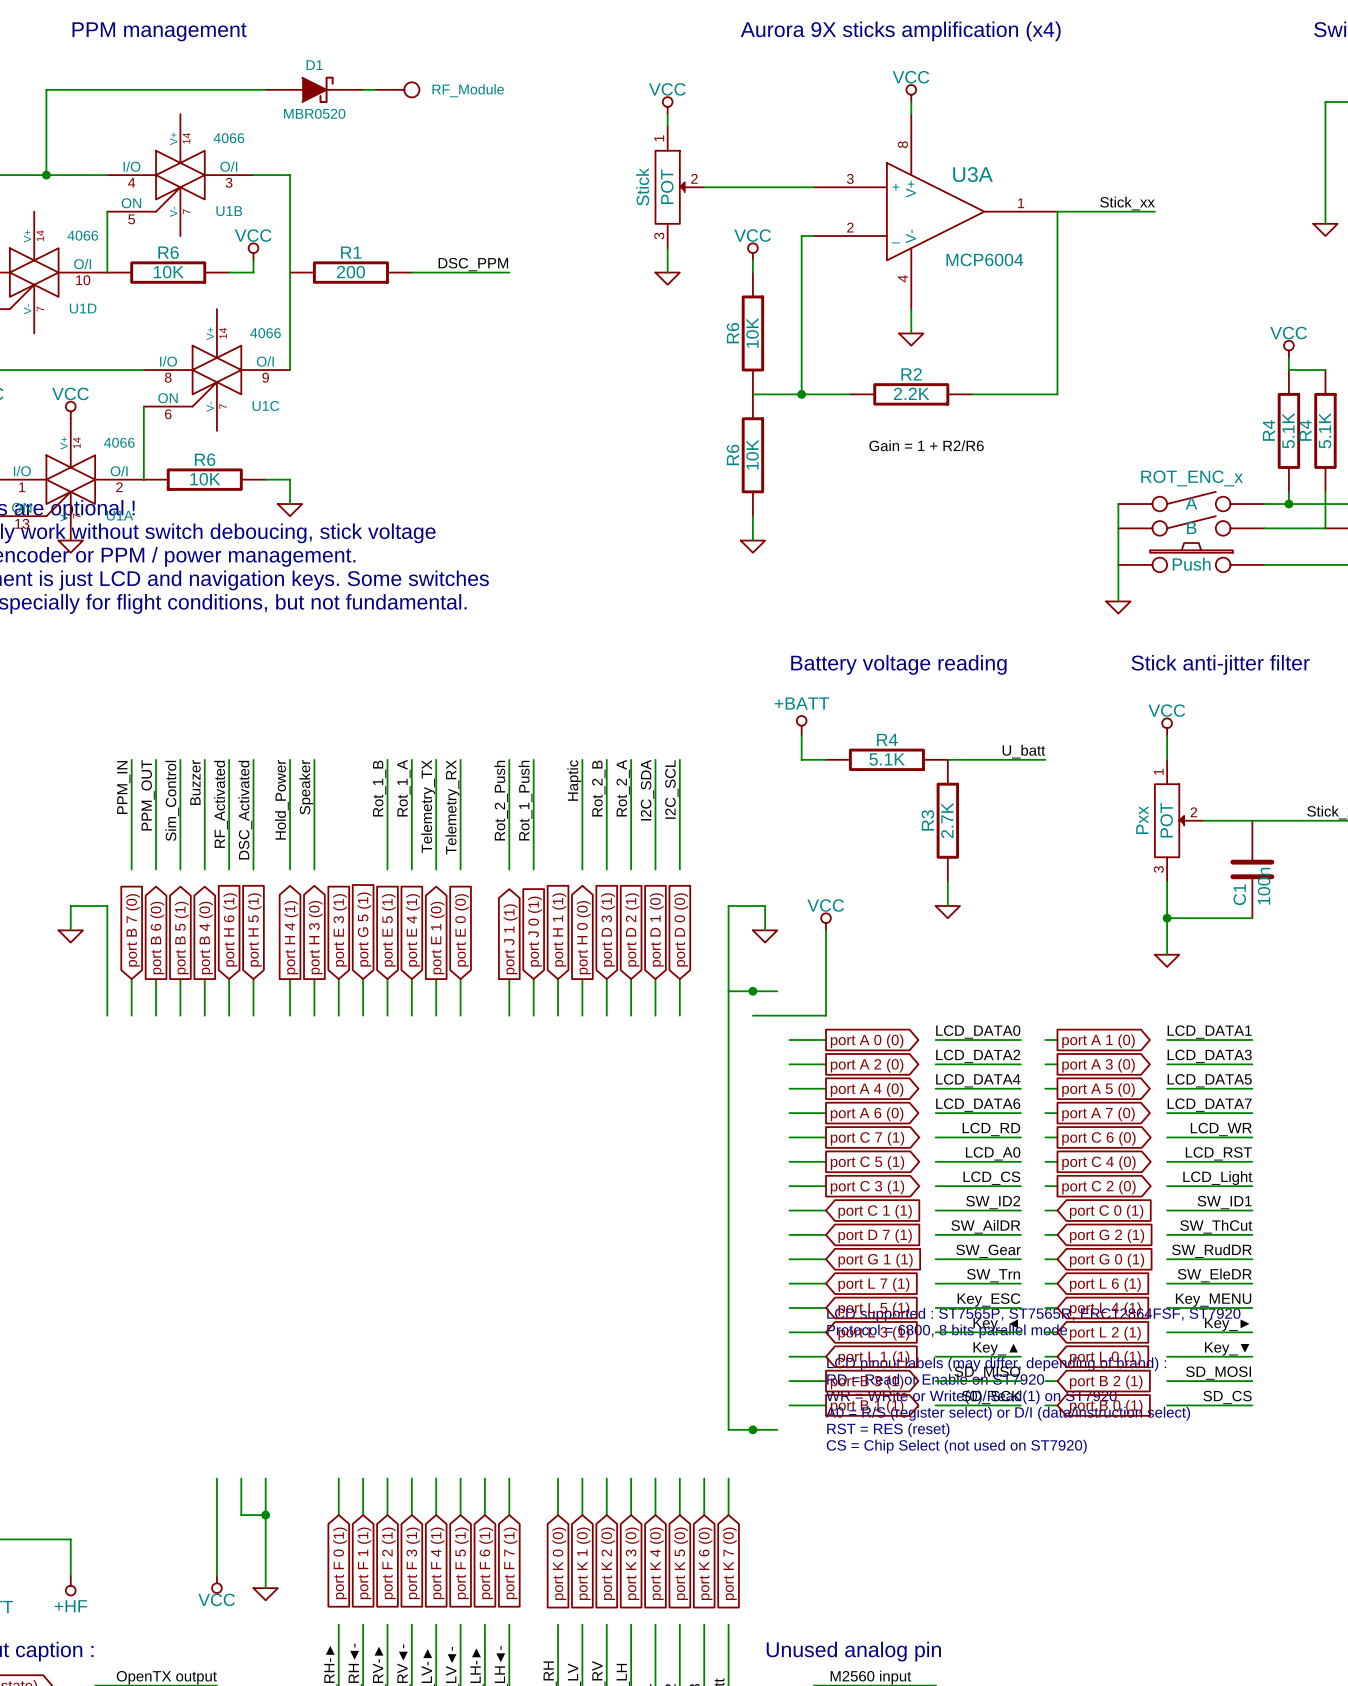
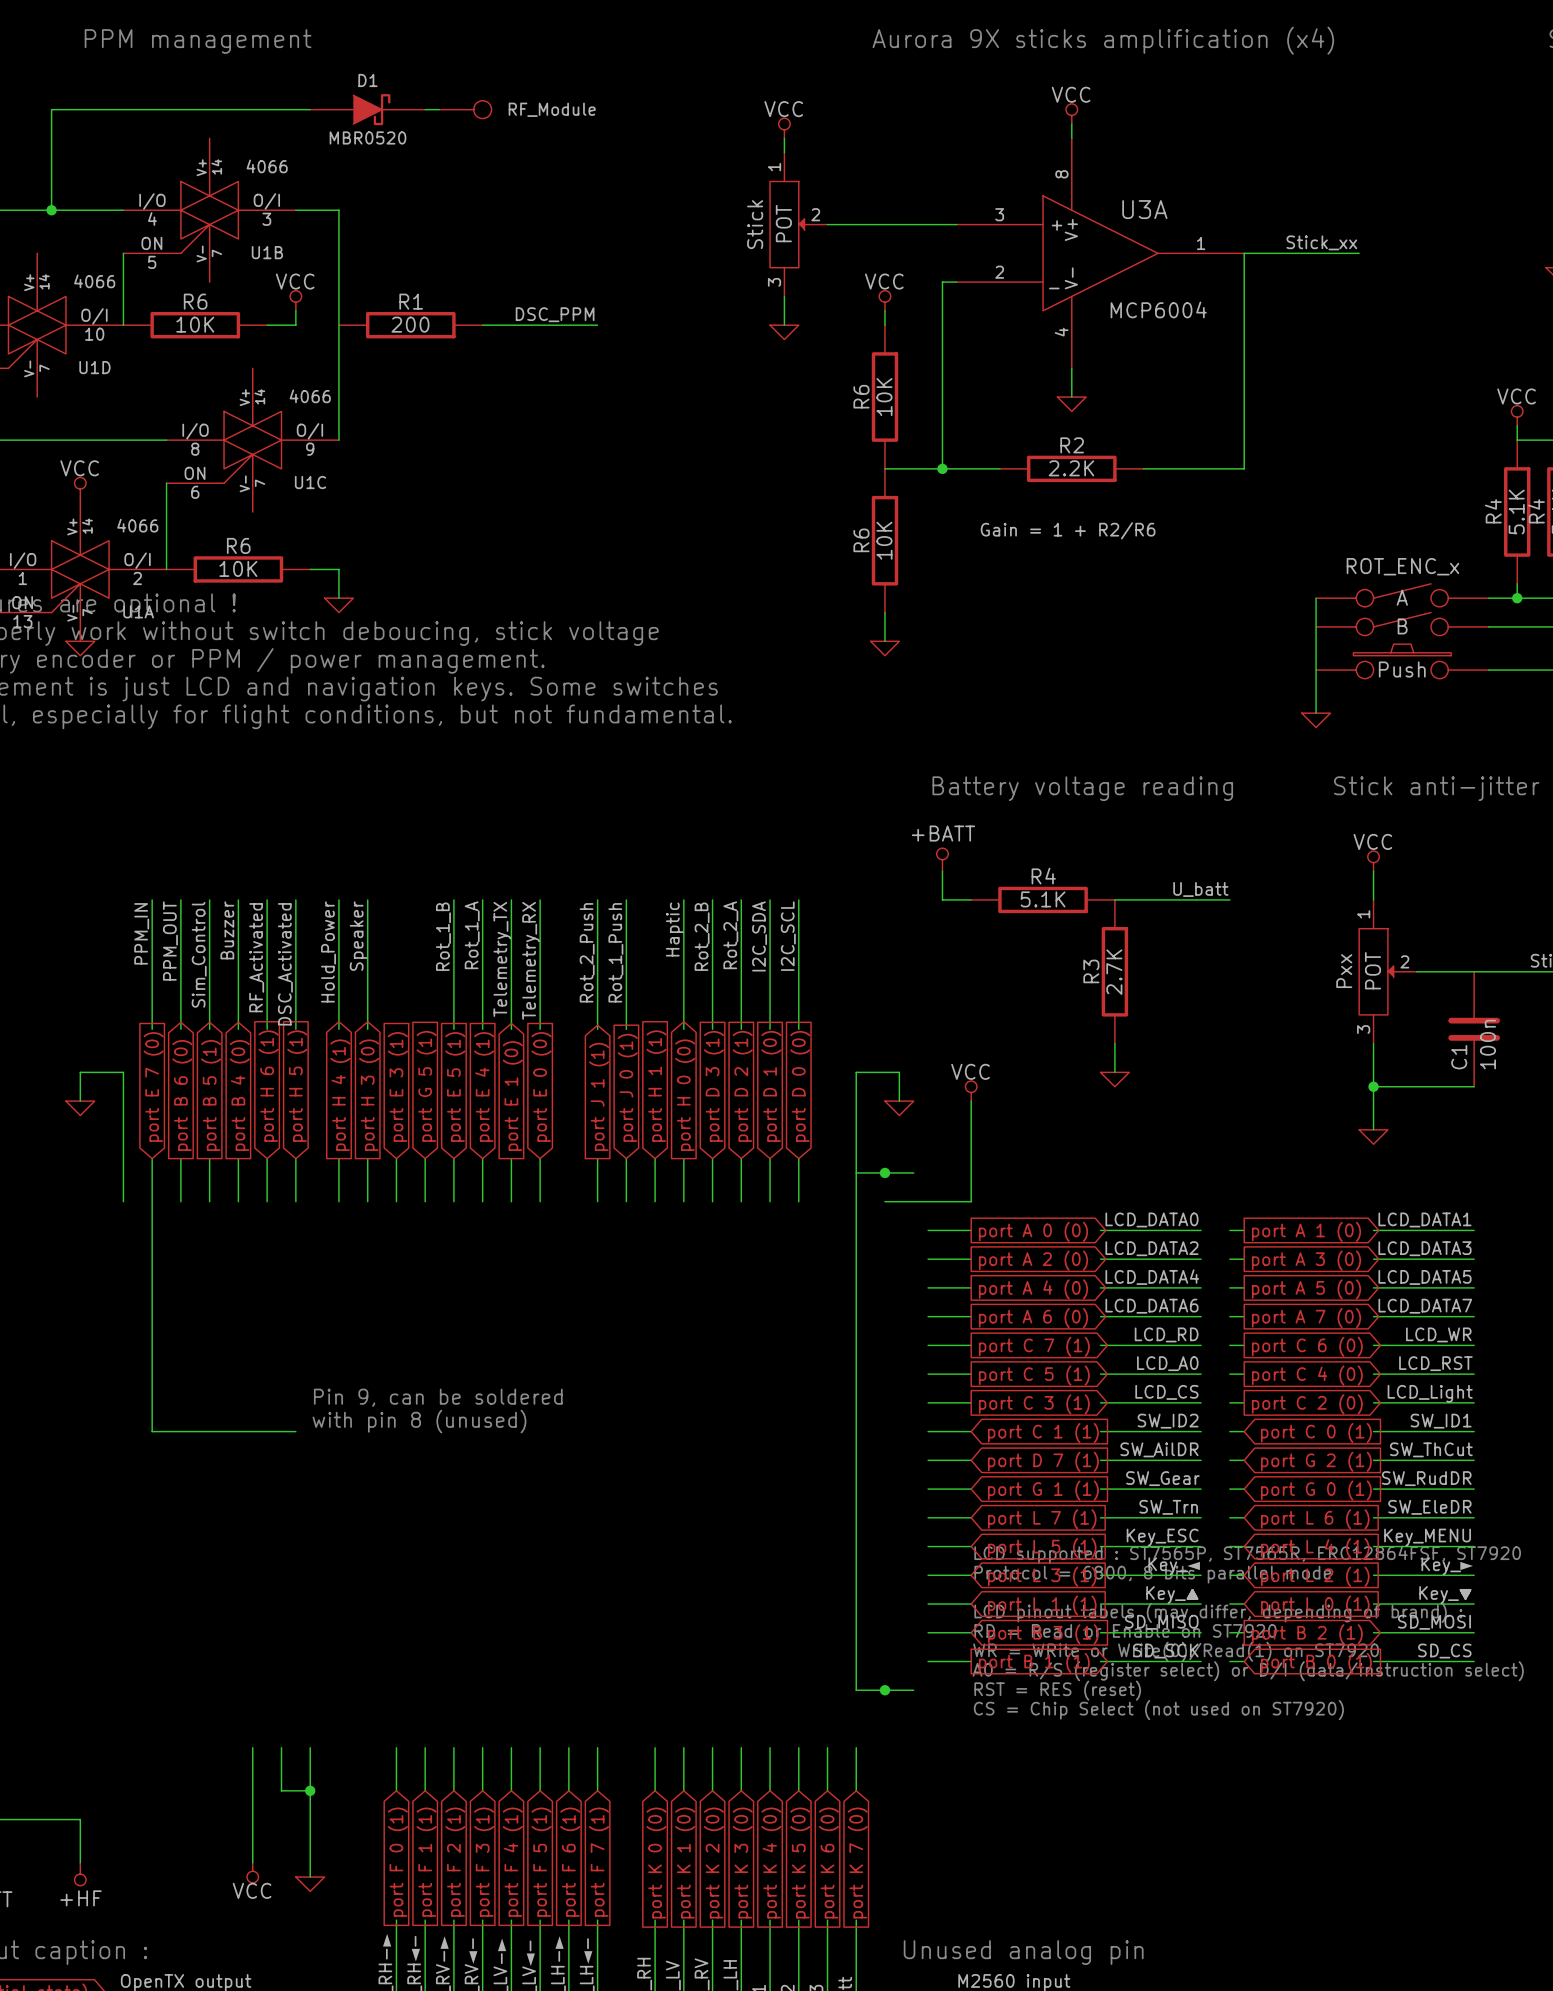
global label: port B 7 (0) (132, 930) -> port E 7 (0) (153, 1086)
wire: none -> (152, 1201) (152, 1431) (295, 1431)
text: none -> Pin 9, can be soldered (438, 1397)
text: none -> with pin 8 (unused) (419, 1421)
global label shape: output (867, 1382) -> input (1043, 1634)
global label shape: input (1106, 1382) -> output (1307, 1634)

